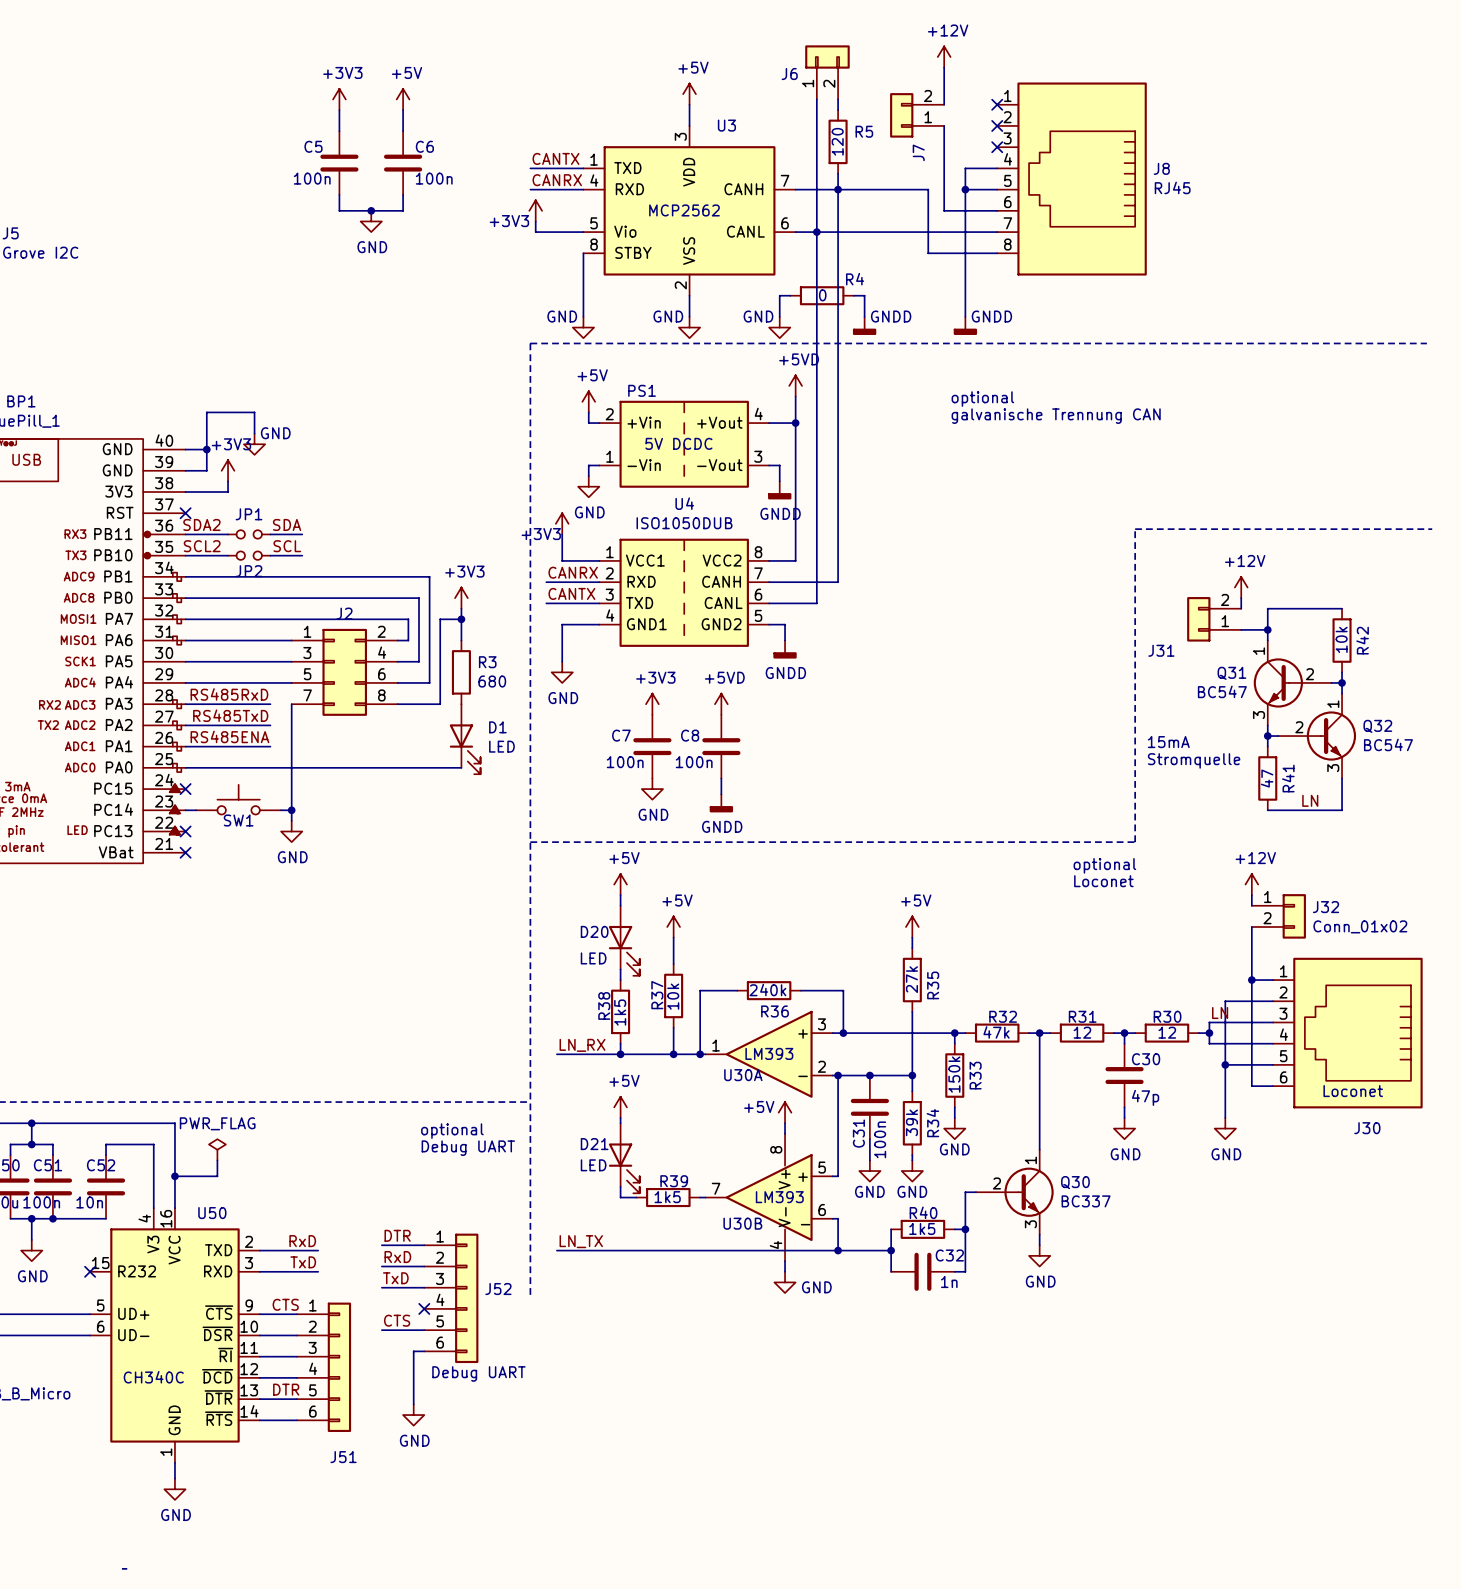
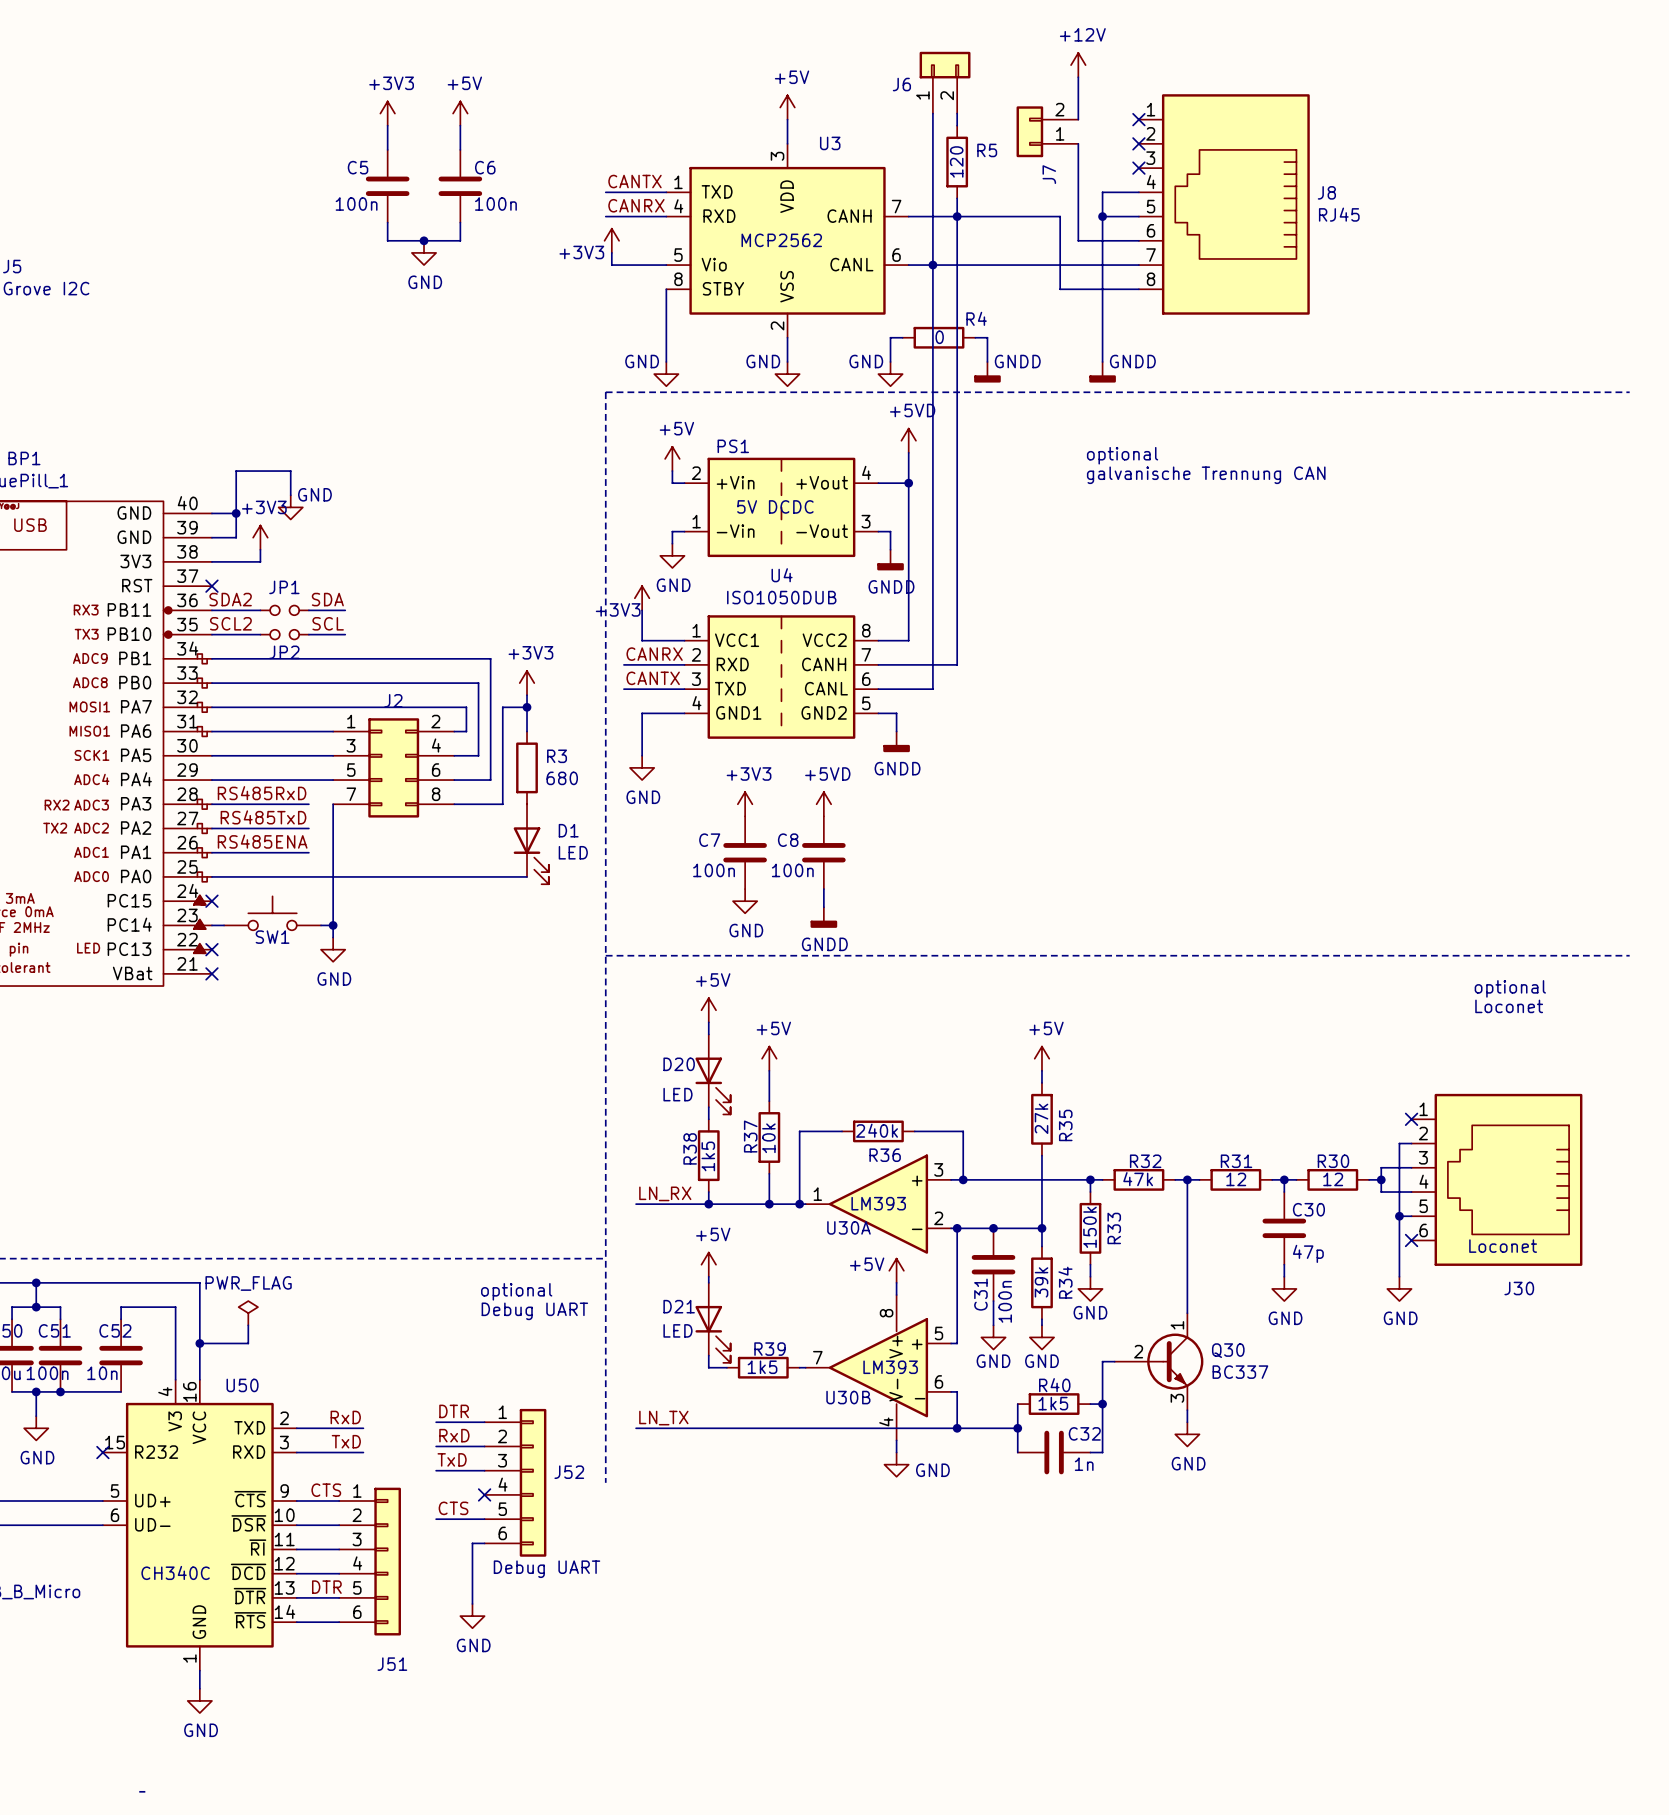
line: (1432, 529) (1135, 529) (1135, 842) (530, 842) -> none
power symbol: +12V (1241, 587) -> none
wire: (1241, 598) (1241, 608) -> none
wire: (1342, 608) (1267, 608) (1267, 640) -> none
J31: (1214, 619) -> none
wire: (1241, 629) (1267, 629) -> none
junction: (1267, 629) -> none
R42: 10k (1342, 640) -> none
wire: (1342, 672) (1342, 693) -> none
Q31: BC547 (1292, 682) -> none
wire: (1331, 682) (1342, 682) -> none
junction: (1342, 682) -> none
wire: (1267, 725) (1267, 746) -> none
wire: (1267, 736) (1278, 736) -> none
junction: (1267, 736) -> none
Q32: BC547 (1317, 736) -> none
text: 15mA (1168, 742) -> none
text: Stromquelle (1194, 760) -> none
R41: 47 (1267, 778) -> none
wire: (1342, 778) (1342, 810) (1267, 810) -> none
label: LN (1310, 800) -> none
line: none -> (605, 955) (1629, 955)
text: optional (1104, 865) -> none
text: none -> optional (1510, 988)
text: Loconet (1103, 881) -> none
text: none -> Loconet (1509, 1006)
power symbol: +12V (1251, 884) -> none
wire: (1251, 895) (1251, 905) -> none
J32: Conn_01x02 (1278, 916) -> none
wire: (1251, 926) (1251, 1086) (1273, 1086) -> none
no-connect mark: none -> (1411, 1119)
junction: (1251, 980) -> none
label: LN (1220, 1013) -> none
J30 position: (1347, 1033) -> (1496, 1179)
no-connect mark: none -> (1411, 1240)

